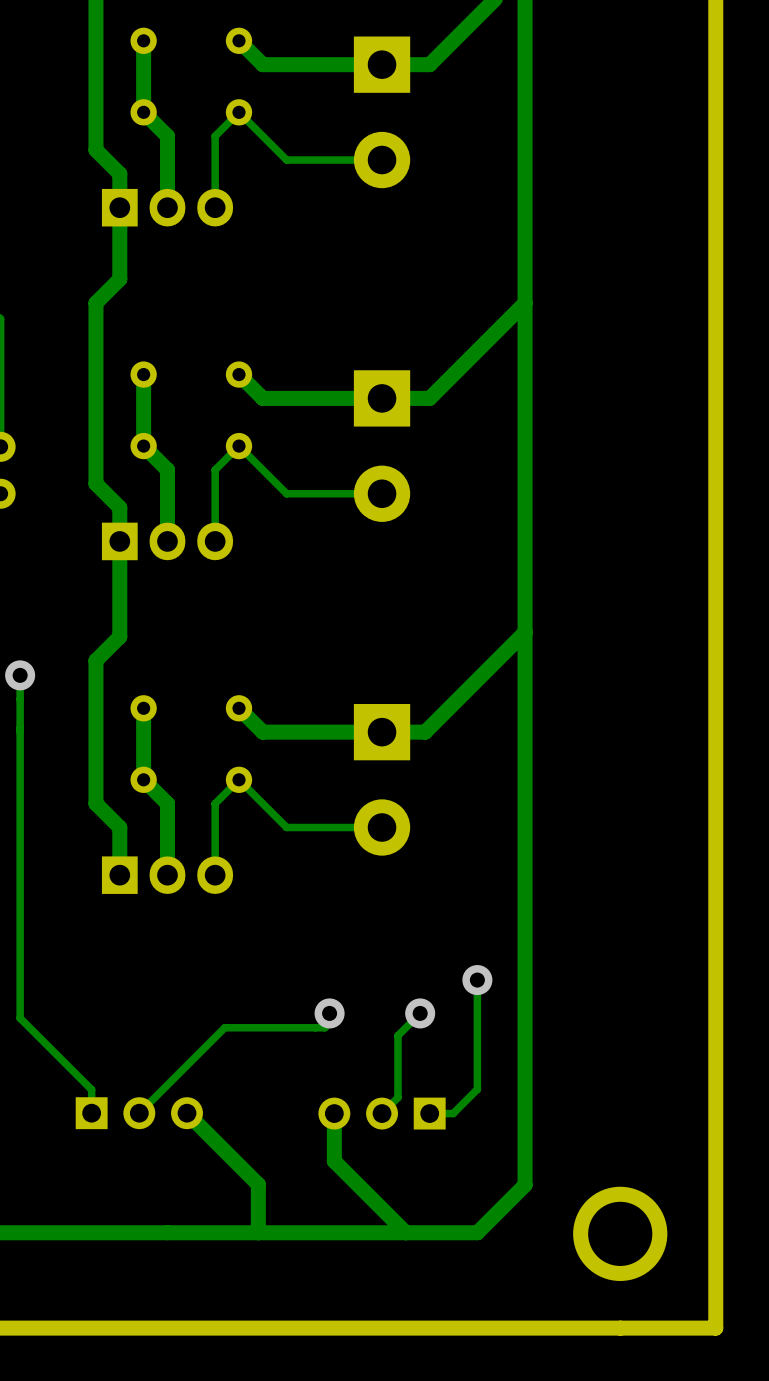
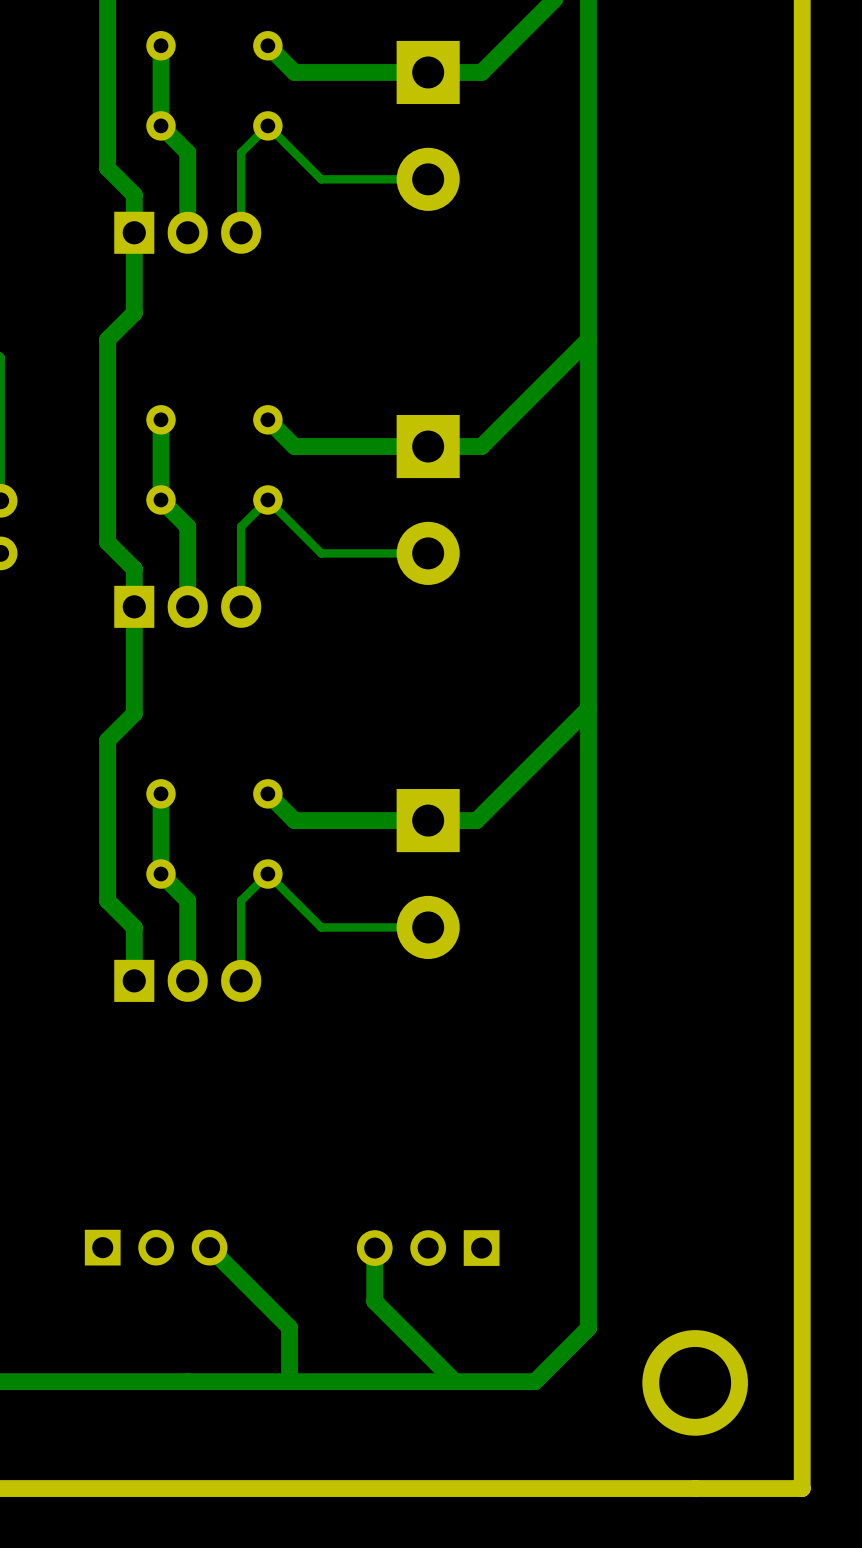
track: (20, 675) (20, 1018) (91, 1089) (91, 1113) -> none
via: (20, 675) -> none
track: (477, 980) (477, 1089) (453, 1113) (429, 1113) -> none
via: (477, 980) -> none
track: (329, 1013) (329, 1022) (324, 1027) (224, 1027) (139, 1113) -> none
via: (329, 1013) -> none
track: (420, 1013) (397, 1035) (397, 1097) (382, 1113) -> none
via: (420, 1013) -> none

